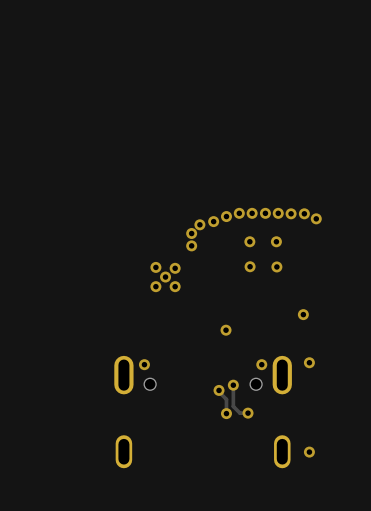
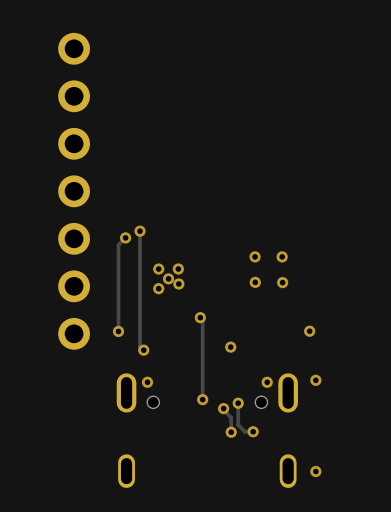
part: none -> (74, 191)
via: (239, 213) -> none
via: (252, 213) -> none
via: (265, 213) -> none
via: (278, 213) -> none
via: (291, 213) -> none
via: (304, 213) -> none
track: none -> (140, 231) (140, 346) (143, 350)
via: none -> (140, 231)
via: (226, 216) -> none
via: (316, 218) -> none
via: (213, 221) -> none
track: none -> (125, 237) (118, 245) (118, 331)
via: none -> (125, 237)
via: (199, 224) -> none
via: (191, 233) -> none
via: (191, 245) -> none
via: none -> (158, 269)
via: none -> (178, 269)
via: none -> (168, 278)
via: (155, 267) -> none
via: none -> (158, 288)
via: (165, 277) -> none
via: (155, 286) -> none
via: (175, 286) -> none
track: none -> (200, 317) (202, 320) (202, 399)
via: none -> (200, 317)
via: none -> (118, 331)
via: none -> (143, 350)
via: none -> (202, 399)

